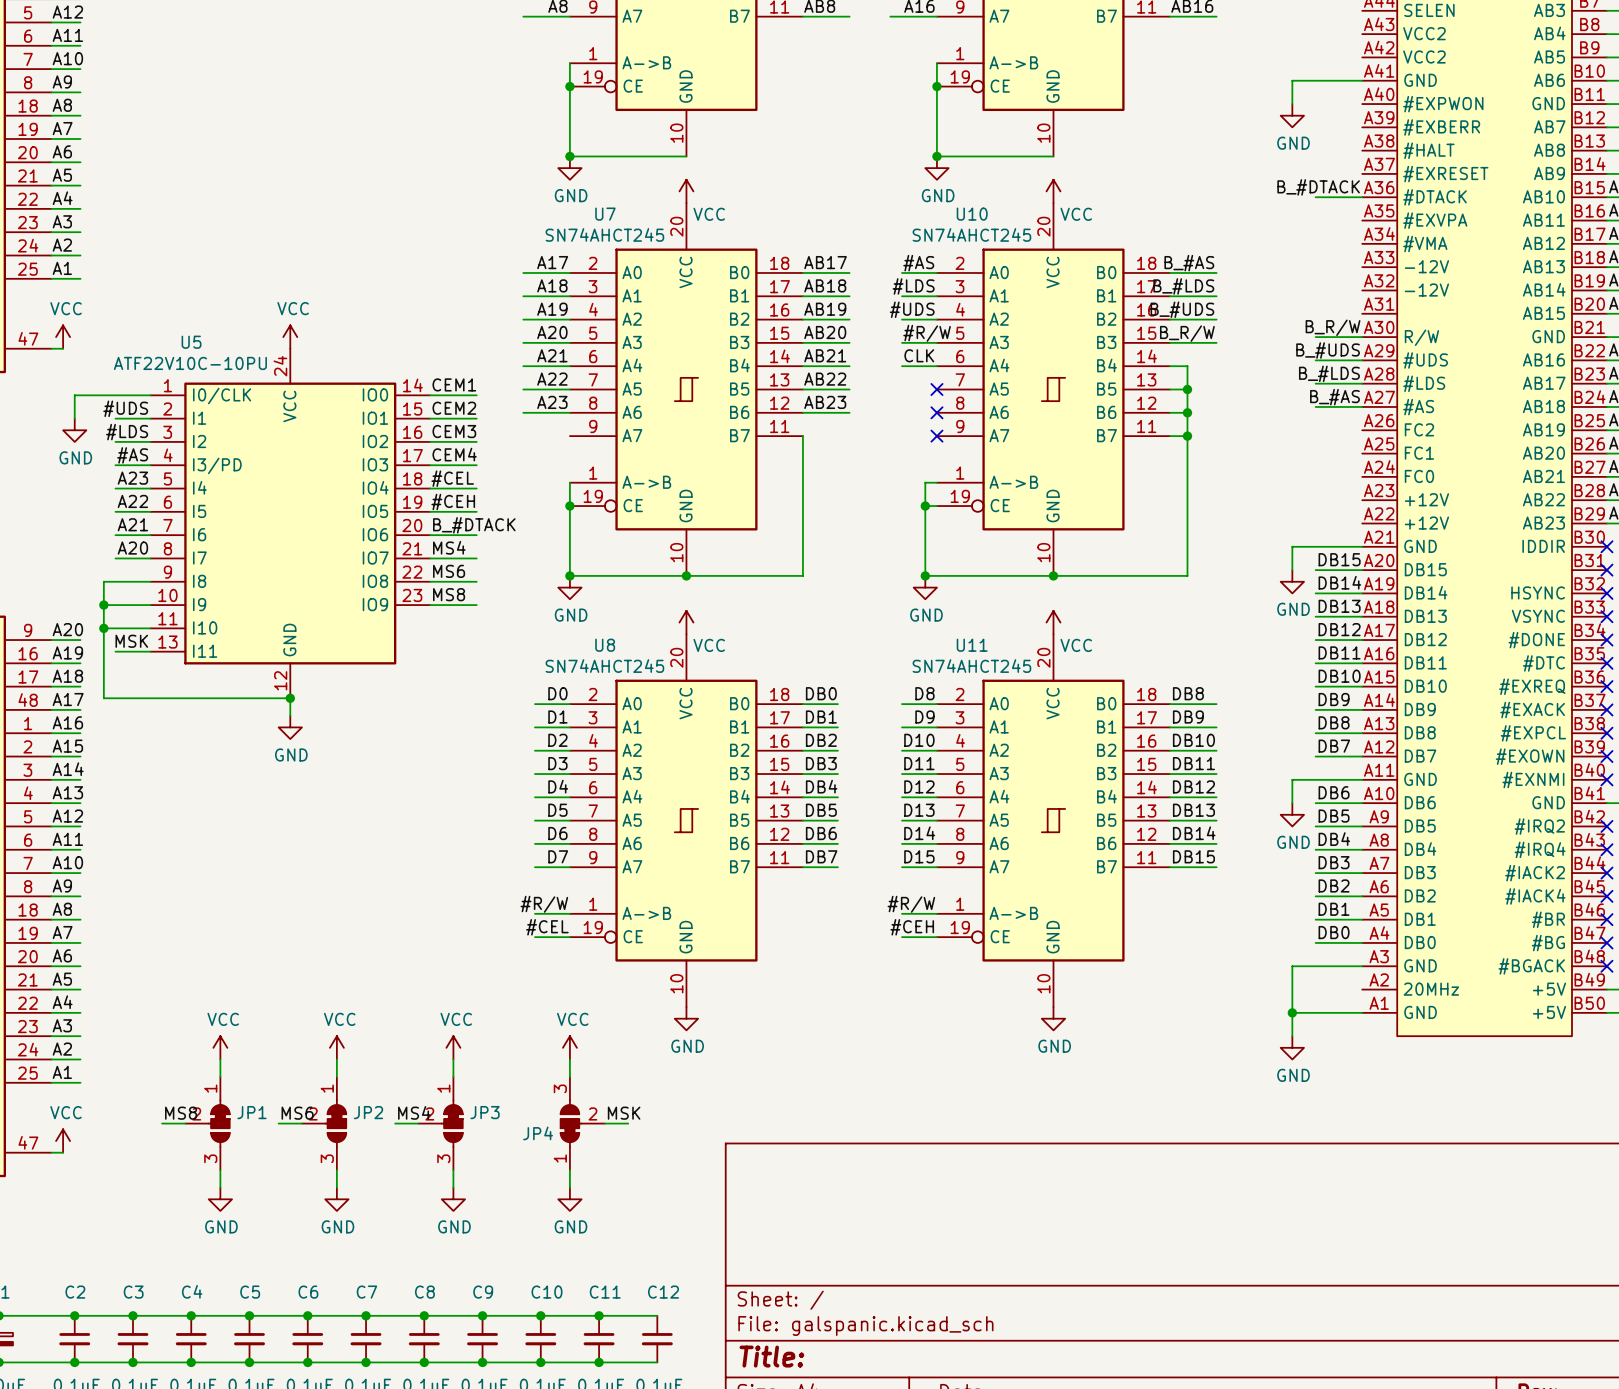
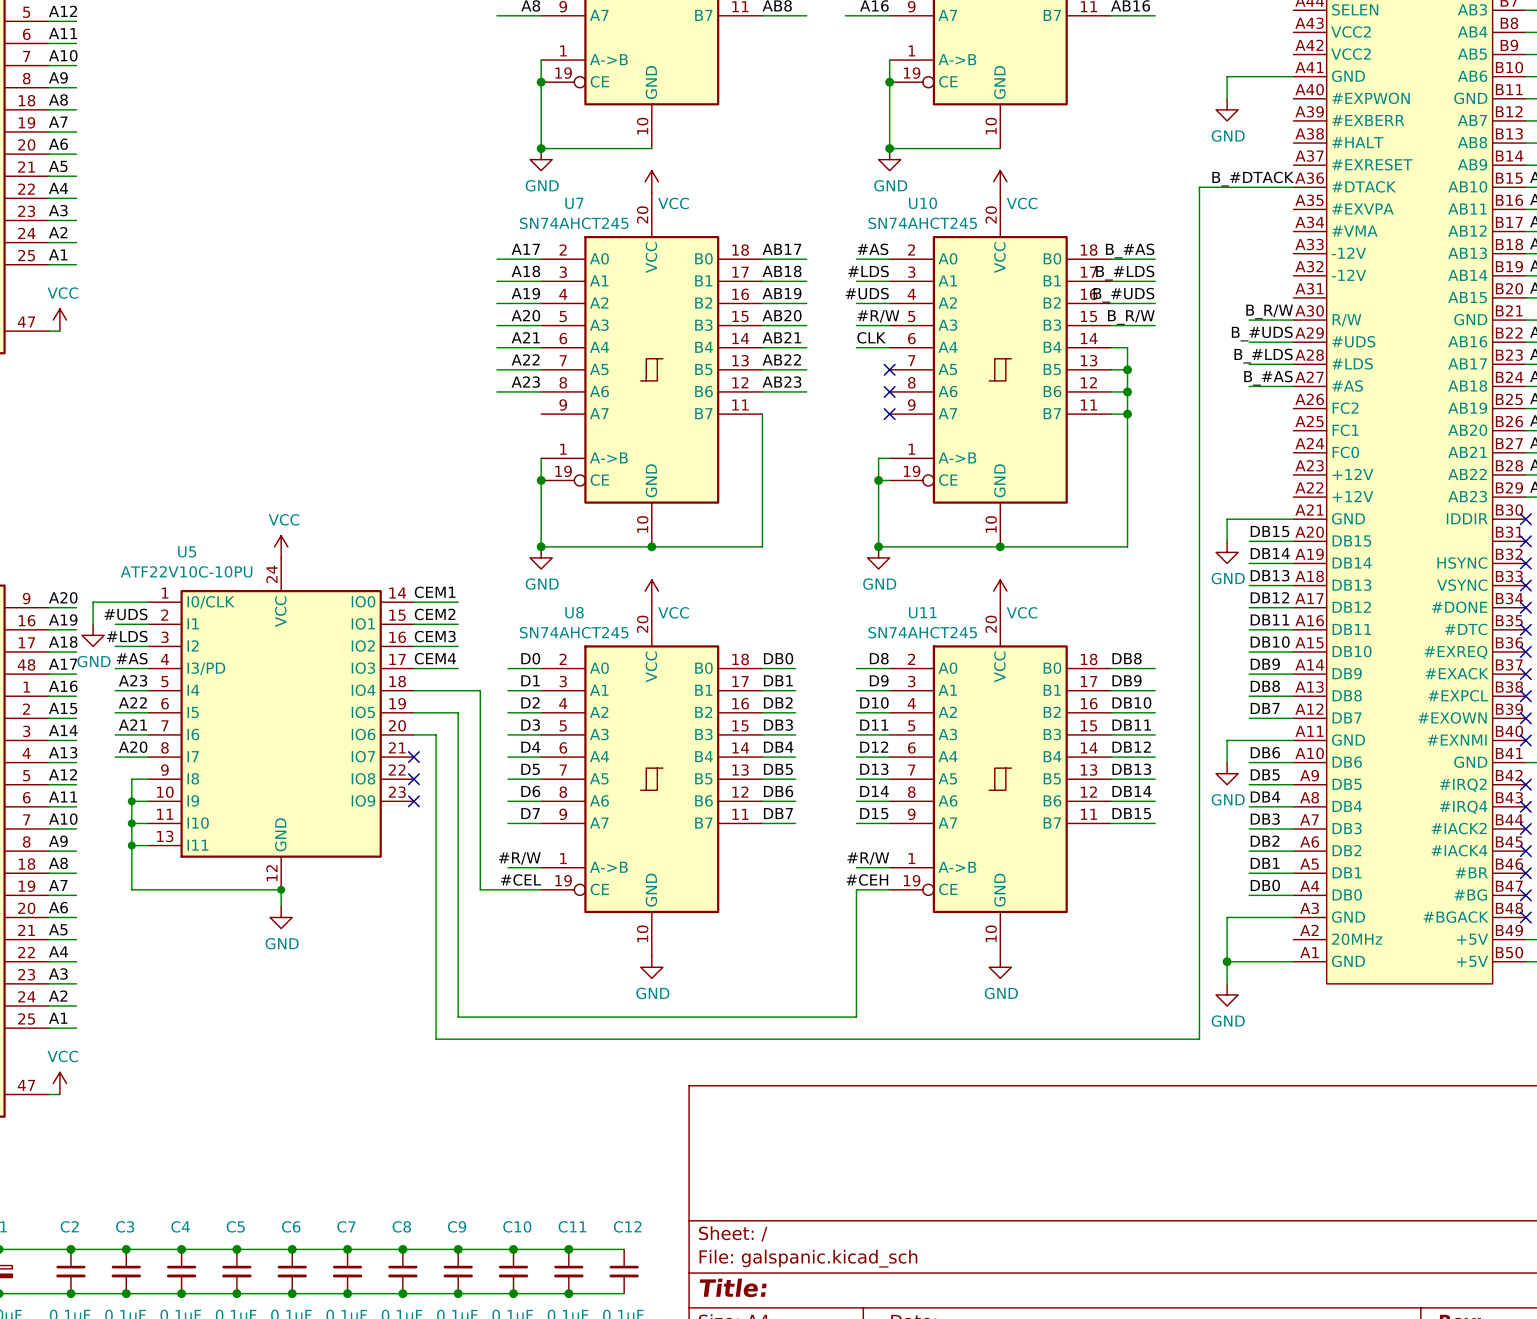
wire: none -> (1249, 187) (1199, 187) (1199, 1039) (436, 1039) (436, 734) (413, 734)
power symbol: VCC (290, 337) -> none
label: CEM1 (454, 384) -> none
wire: (150, 395) (74, 395) (74, 418) -> none
wire: (430, 395) (476, 395) -> none
label: #UDS (125, 408) -> none
label: CEM2 (454, 408) -> none
wire: (115, 418) (150, 418) -> none
wire: (430, 418) (476, 418) -> (413, 602) (458, 602)
power symbol: GND (74, 430) -> none
label: CEM3 (454, 431) -> none
label: #LDS (127, 432) -> none
wire: (115, 441) (150, 441) -> (115, 624) (148, 624)
wire: (430, 441) (476, 441) -> (413, 624) (458, 624)
label: CEM4 (454, 454) -> none
label: #AS (132, 455) -> none
wire: (115, 465) (150, 465) -> (115, 646) (148, 646)
wire: (430, 465) (476, 465) -> (413, 646) (458, 646)
label: A23 (132, 478) -> none
label: #CEL (452, 478) -> none
wire: (115, 488) (150, 488) -> (115, 668) (148, 668)
wire: (430, 488) (476, 488) -> (413, 668) (458, 668)
label: A22 (132, 501) -> none
label: #CEH (453, 502) -> none
wire: (115, 511) (150, 511) -> (115, 690) (148, 690)
wire: (430, 511) (476, 511) -> none
U5 position: (290, 523) -> (281, 723)
label: A21 (132, 524) -> none
label: B_#DTACK (474, 525) -> none
wire: (115, 535) (150, 535) -> (115, 712) (148, 712)
wire: (430, 535) (476, 535) -> none
label: MS4 (449, 547) -> none
label: A20 (132, 548) -> none
wire: (115, 558) (150, 558) -> (115, 734) (148, 734)
wire: (430, 558) (476, 558) -> none
label: MS6 (449, 571) -> none
power symbol: none -> VCC (281, 546)
wire: (150, 581) (103, 581) (103, 698) (290, 698) (290, 715) -> none
wire: (430, 581) (476, 581) -> none
label: MS8 (449, 594) -> none
wire: (103, 605) (150, 605) -> none
junction: (103, 605) -> none
wire: (430, 605) (476, 605) -> none
label: none -> CEM1 (435, 592)
wire: (103, 628) (150, 628) -> none
junction: (103, 628) -> none
wire: none -> (148, 602) (93, 602) (93, 624)
label: MSK (131, 641) -> #UDS (126, 614)
label: none -> CEM2 (435, 614)
wire: (115, 651) (150, 651) -> (115, 757) (148, 757)
power symbol: none -> GND (93, 635)
label: none -> #LDS (127, 636)
label: none -> CEM3 (435, 636)
label: none -> CEM4 (435, 658)
label: none -> #AS (132, 658)
junction: (290, 698) -> none
label: none -> A23 (133, 680)
power symbol: GND (290, 727) -> none
wire: none -> (413, 690) (480, 690) (480, 889) (507, 889)
label: none -> A22 (132, 702)
wire: none -> (413, 712) (458, 712) (458, 1017) (856, 1017) (856, 889)
label: none -> A21 (132, 724)
label: none -> A20 (133, 747)
no-connect mark: none -> (413, 757)
wire: none -> (148, 779) (131, 779) (131, 889) (281, 889) (281, 906)
no-connect mark: none -> (413, 779)
wire: none -> (131, 801) (148, 801)
junction: none -> (131, 801)
no-connect mark: none -> (413, 801)
wire: none -> (131, 823) (148, 823)
junction: none -> (131, 823)
wire: none -> (131, 845) (148, 845)
junction: none -> (131, 845)
junction: none -> (281, 889)
power symbol: none -> GND (281, 917)
power symbol: VCC (220, 1047) -> none
power symbol: VCC (336, 1047) -> none
power symbol: VCC (453, 1047) -> none
power symbol: VCC (569, 1047) -> none
wire: (220, 1059) (220, 1076) -> none
wire: (336, 1059) (336, 1076) -> none
wire: (453, 1059) (453, 1076) -> none
wire: (569, 1059) (569, 1076) -> none
label: MS4 (414, 1112) -> none
label: MS8 (181, 1113) -> none
label: MS6 (297, 1113) -> none
label: MSK (624, 1113) -> none
wire: (162, 1123) (185, 1123) -> none
JP1: (207, 1123) -> none
wire: (278, 1123) (301, 1123) -> none
JP2: (324, 1123) -> none
wire: (395, 1123) (418, 1123) -> none
JP3: (440, 1123) -> none
JP4: (582, 1123) -> none
wire: (604, 1123) (628, 1123) -> none
wire: (220, 1170) (220, 1187) -> none
wire: (336, 1170) (336, 1187) -> none
wire: (453, 1170) (453, 1187) -> none
wire: (569, 1170) (569, 1187) -> none
power symbol: GND (220, 1199) -> none
power symbol: GND (336, 1199) -> none
power symbol: GND (453, 1199) -> none
power symbol: GND (569, 1199) -> none

